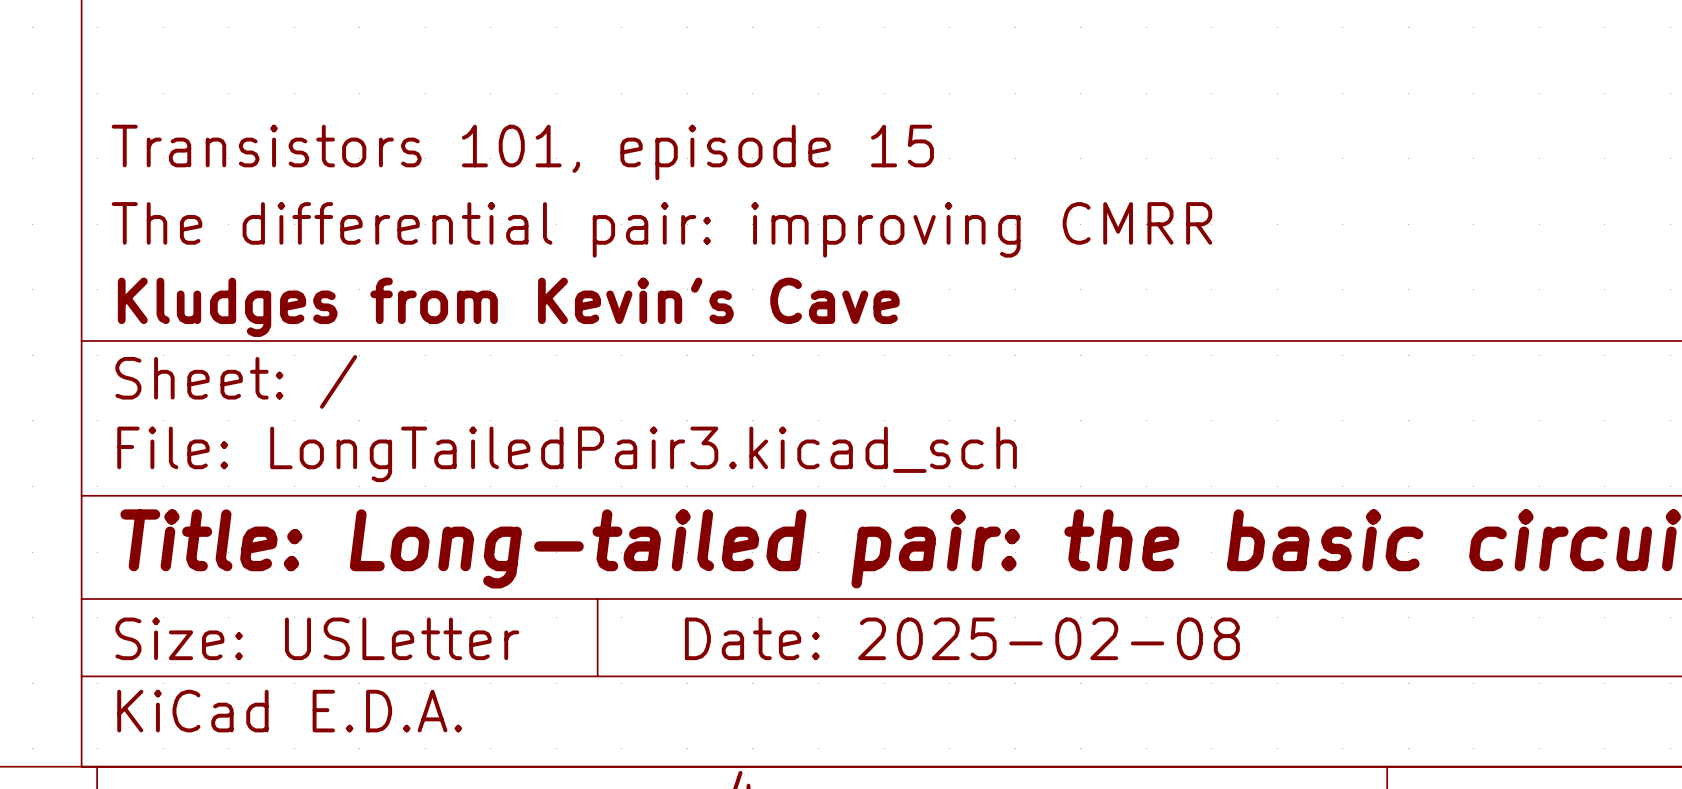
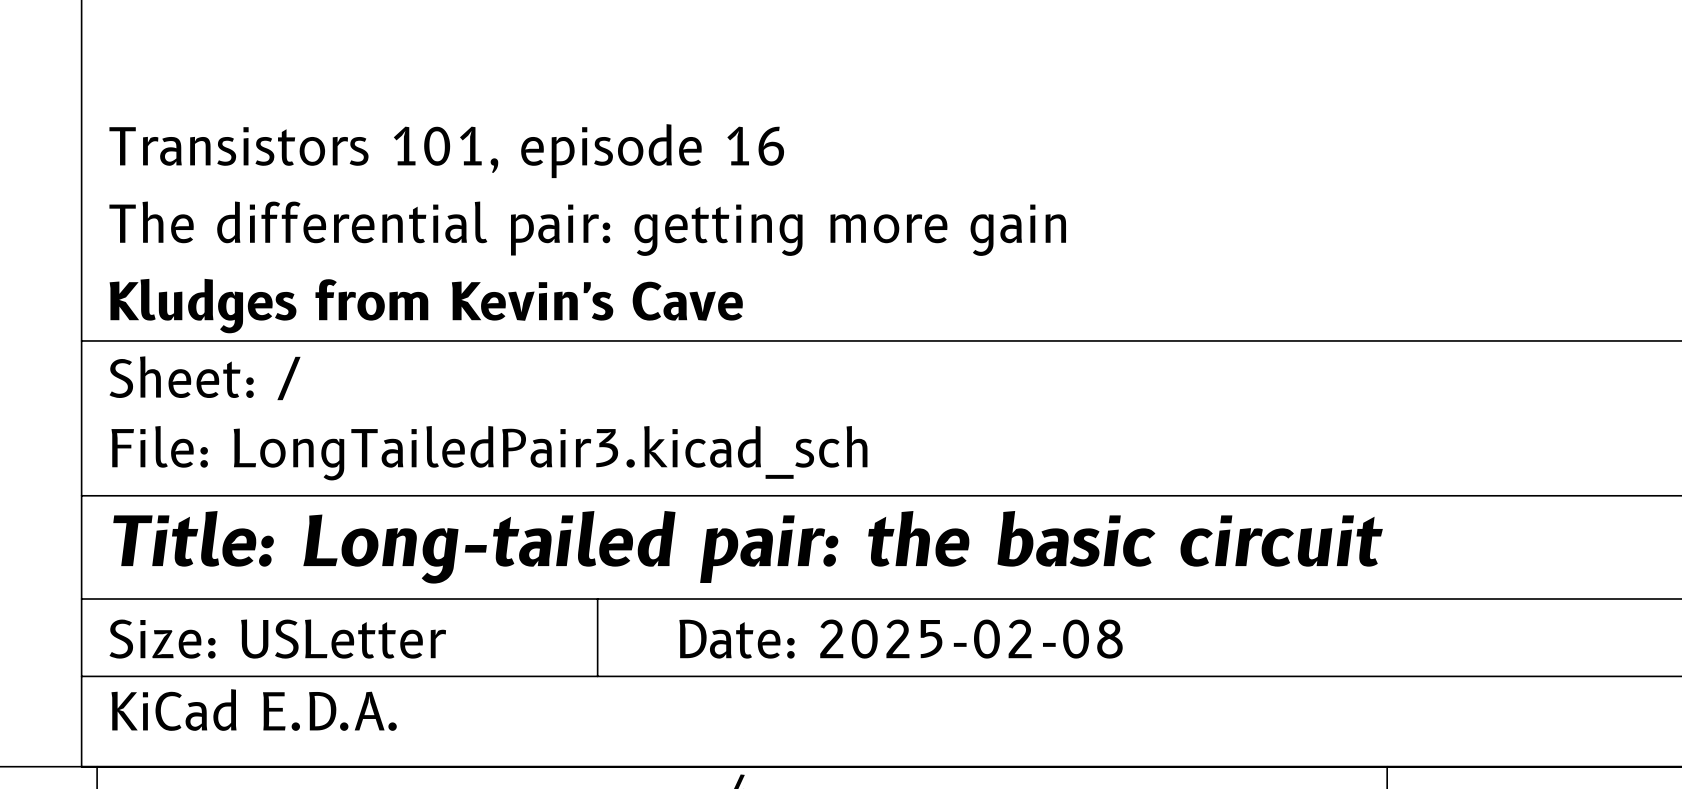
title block: Transistors 101, episode 15 (522, 152) -> Transistors 101, episode 16 (446, 151)
title block: The differential pair: improving CMRR (661, 229) -> The differential pair: getting more gain (587, 228)

